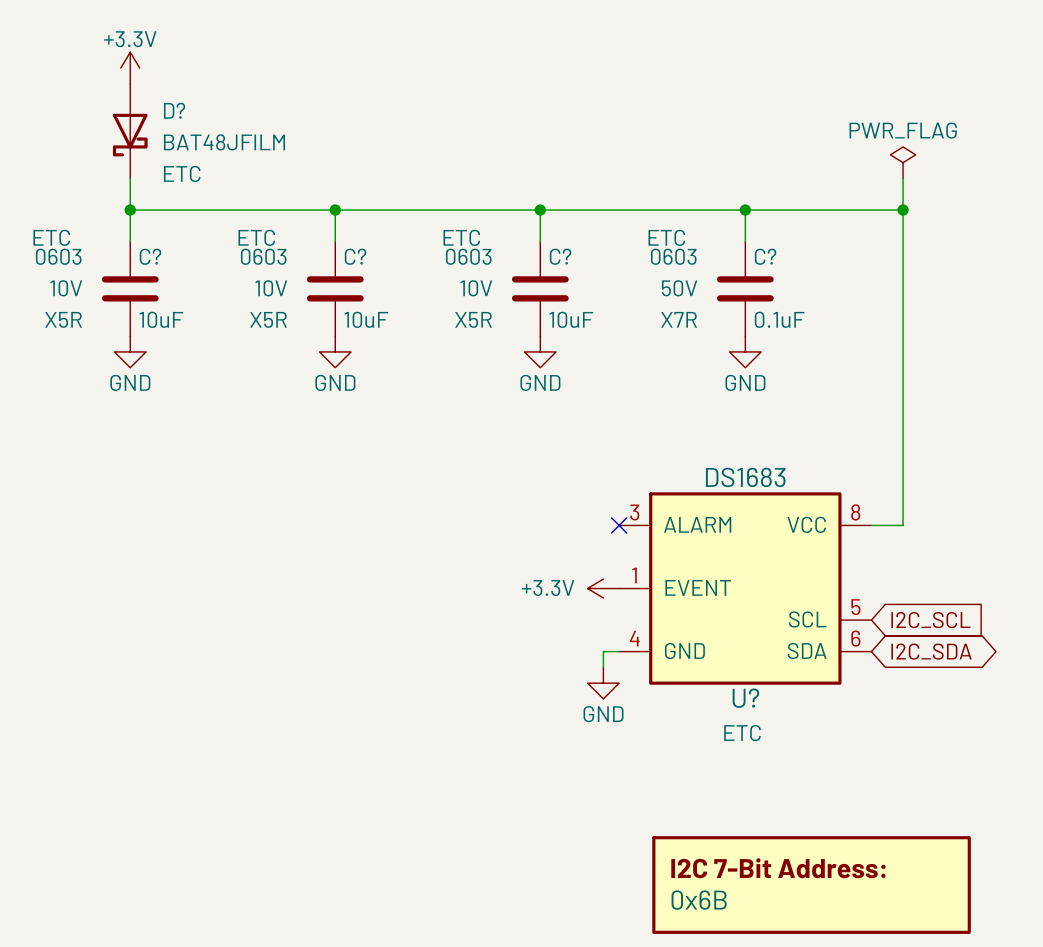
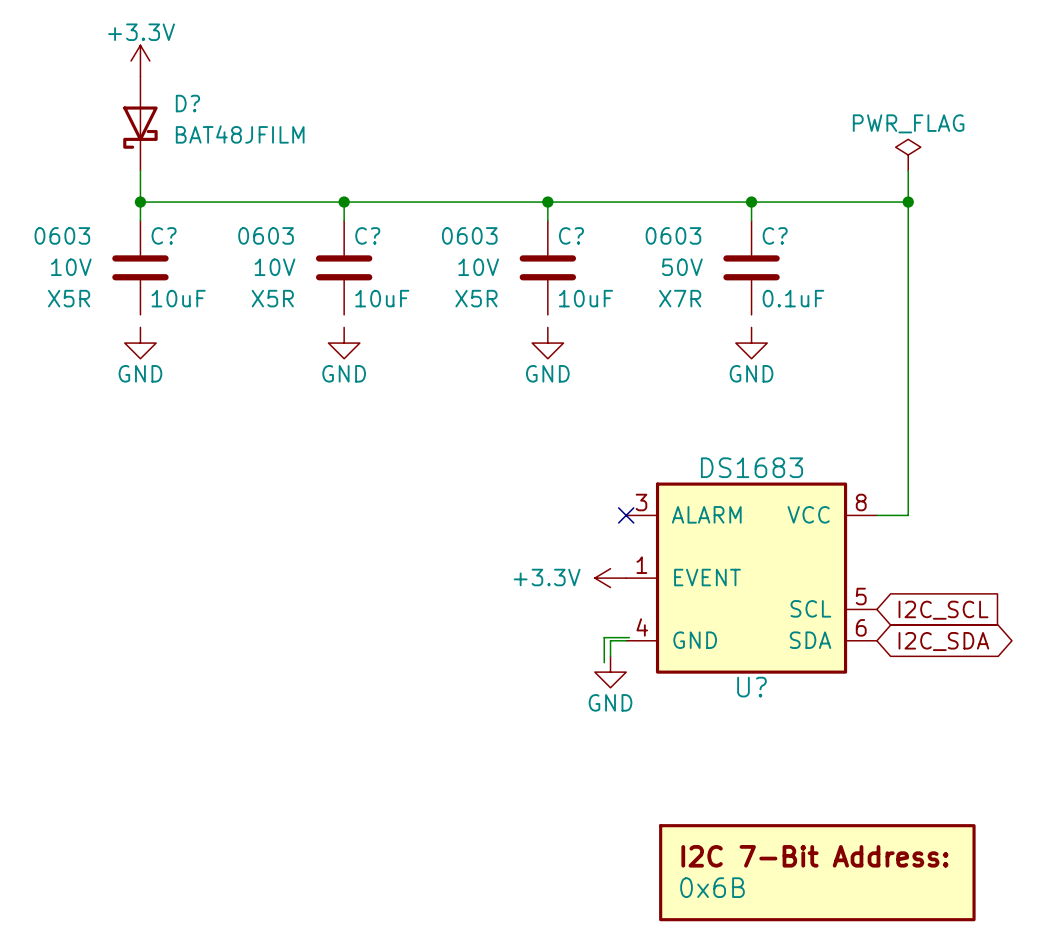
D? text: ETC (182, 173) -> none
C?: none -> 10uF (140, 267)
C?: none -> 10uF (344, 267)
C?: none -> 10uF (547, 267)
C?: none -> 0.1uF (751, 267)
C?: 10uF (130, 288) -> none
C?: 10uF (335, 288) -> none
C?: 10uF (540, 288) -> none
C?: 0.1uF (745, 288) -> none
wire: none -> (629, 637) (604, 637) (604, 662)
U? text: ETC (742, 733) -> none

